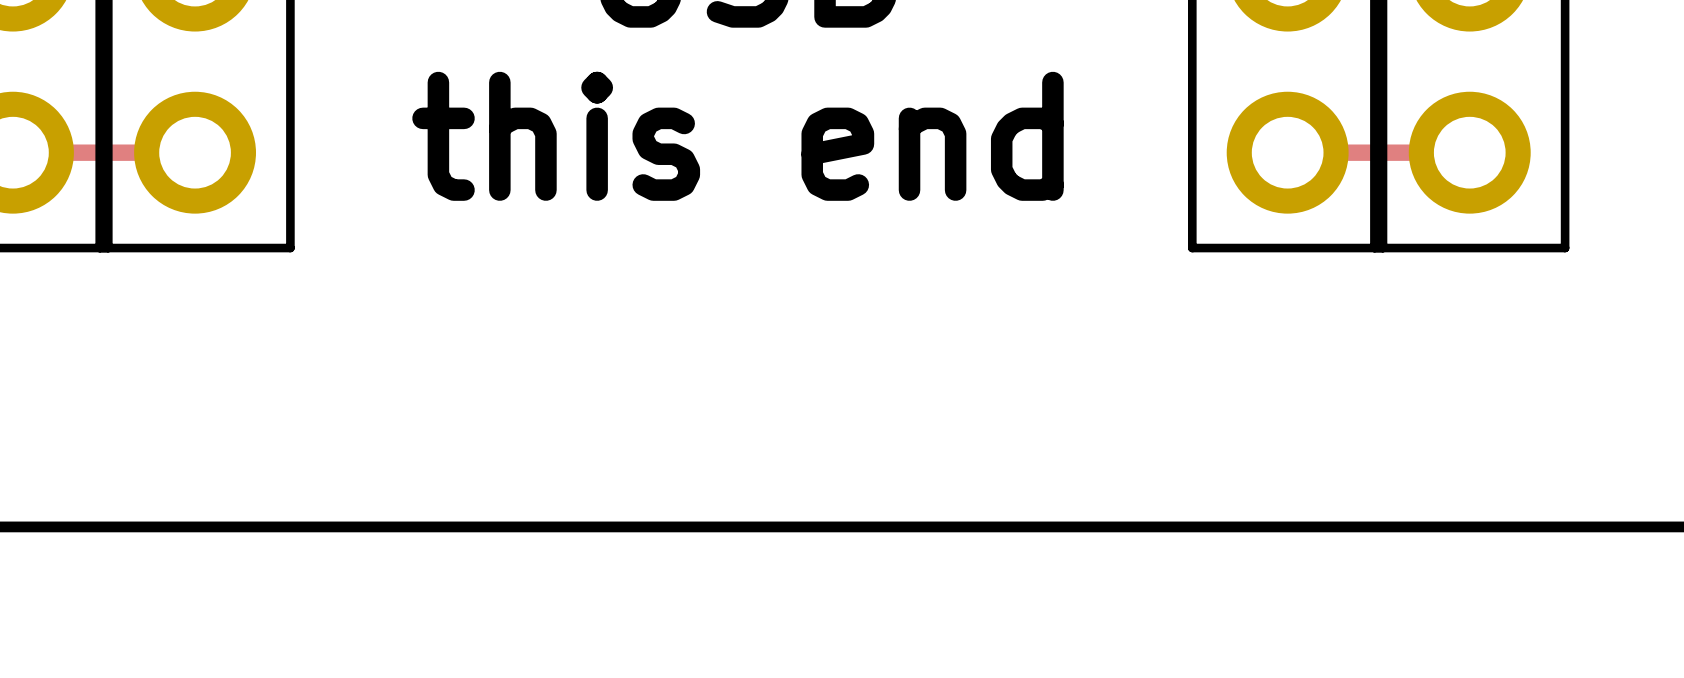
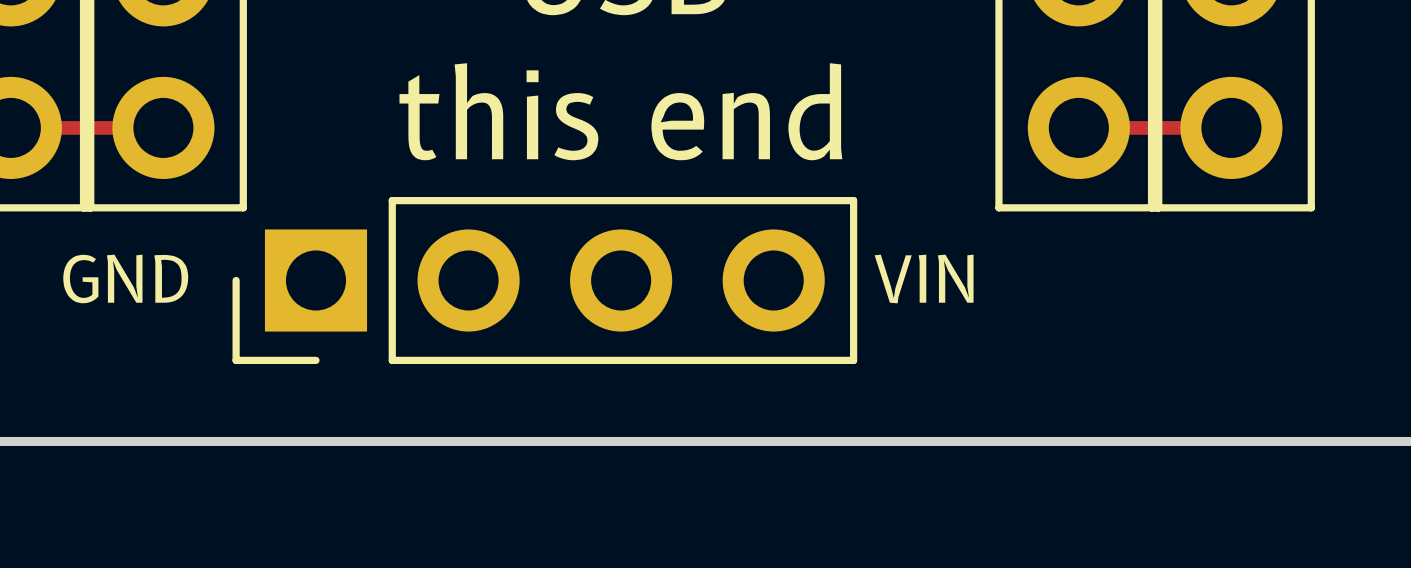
text: none -> GND (125, 278)
text: none -> VIN (924, 279)
part: none -> (544, 280)

